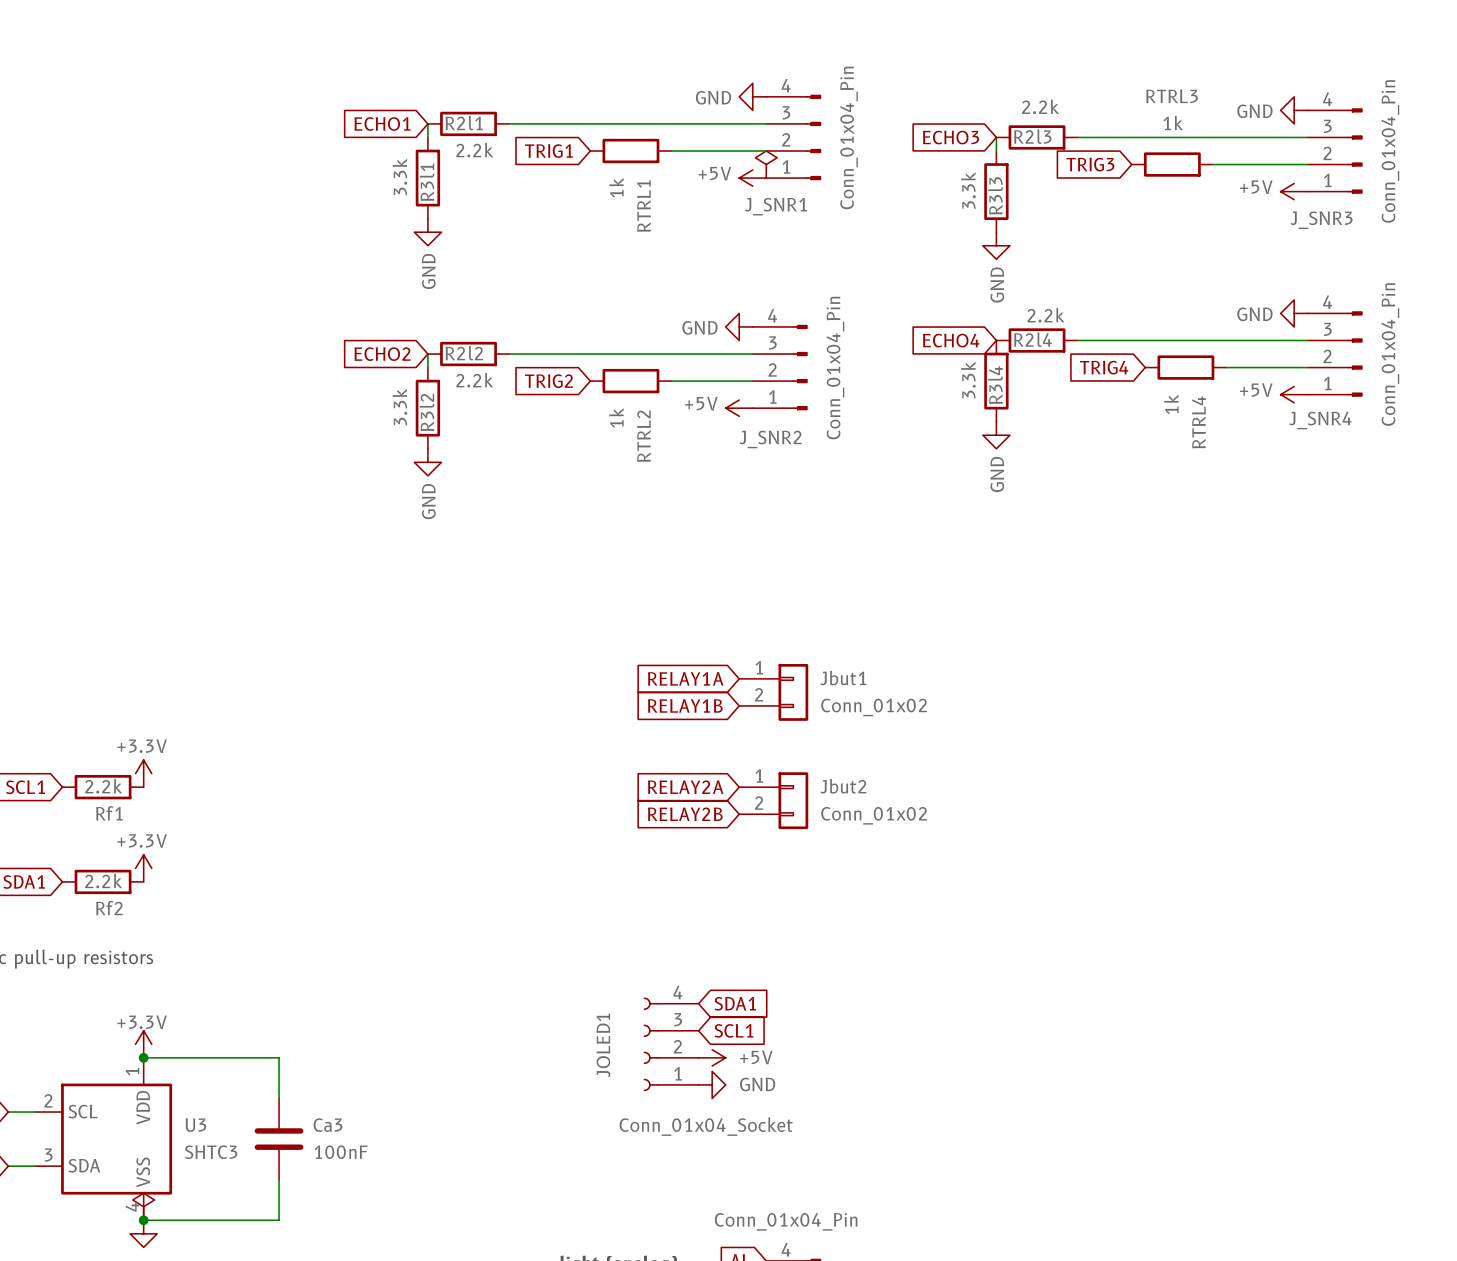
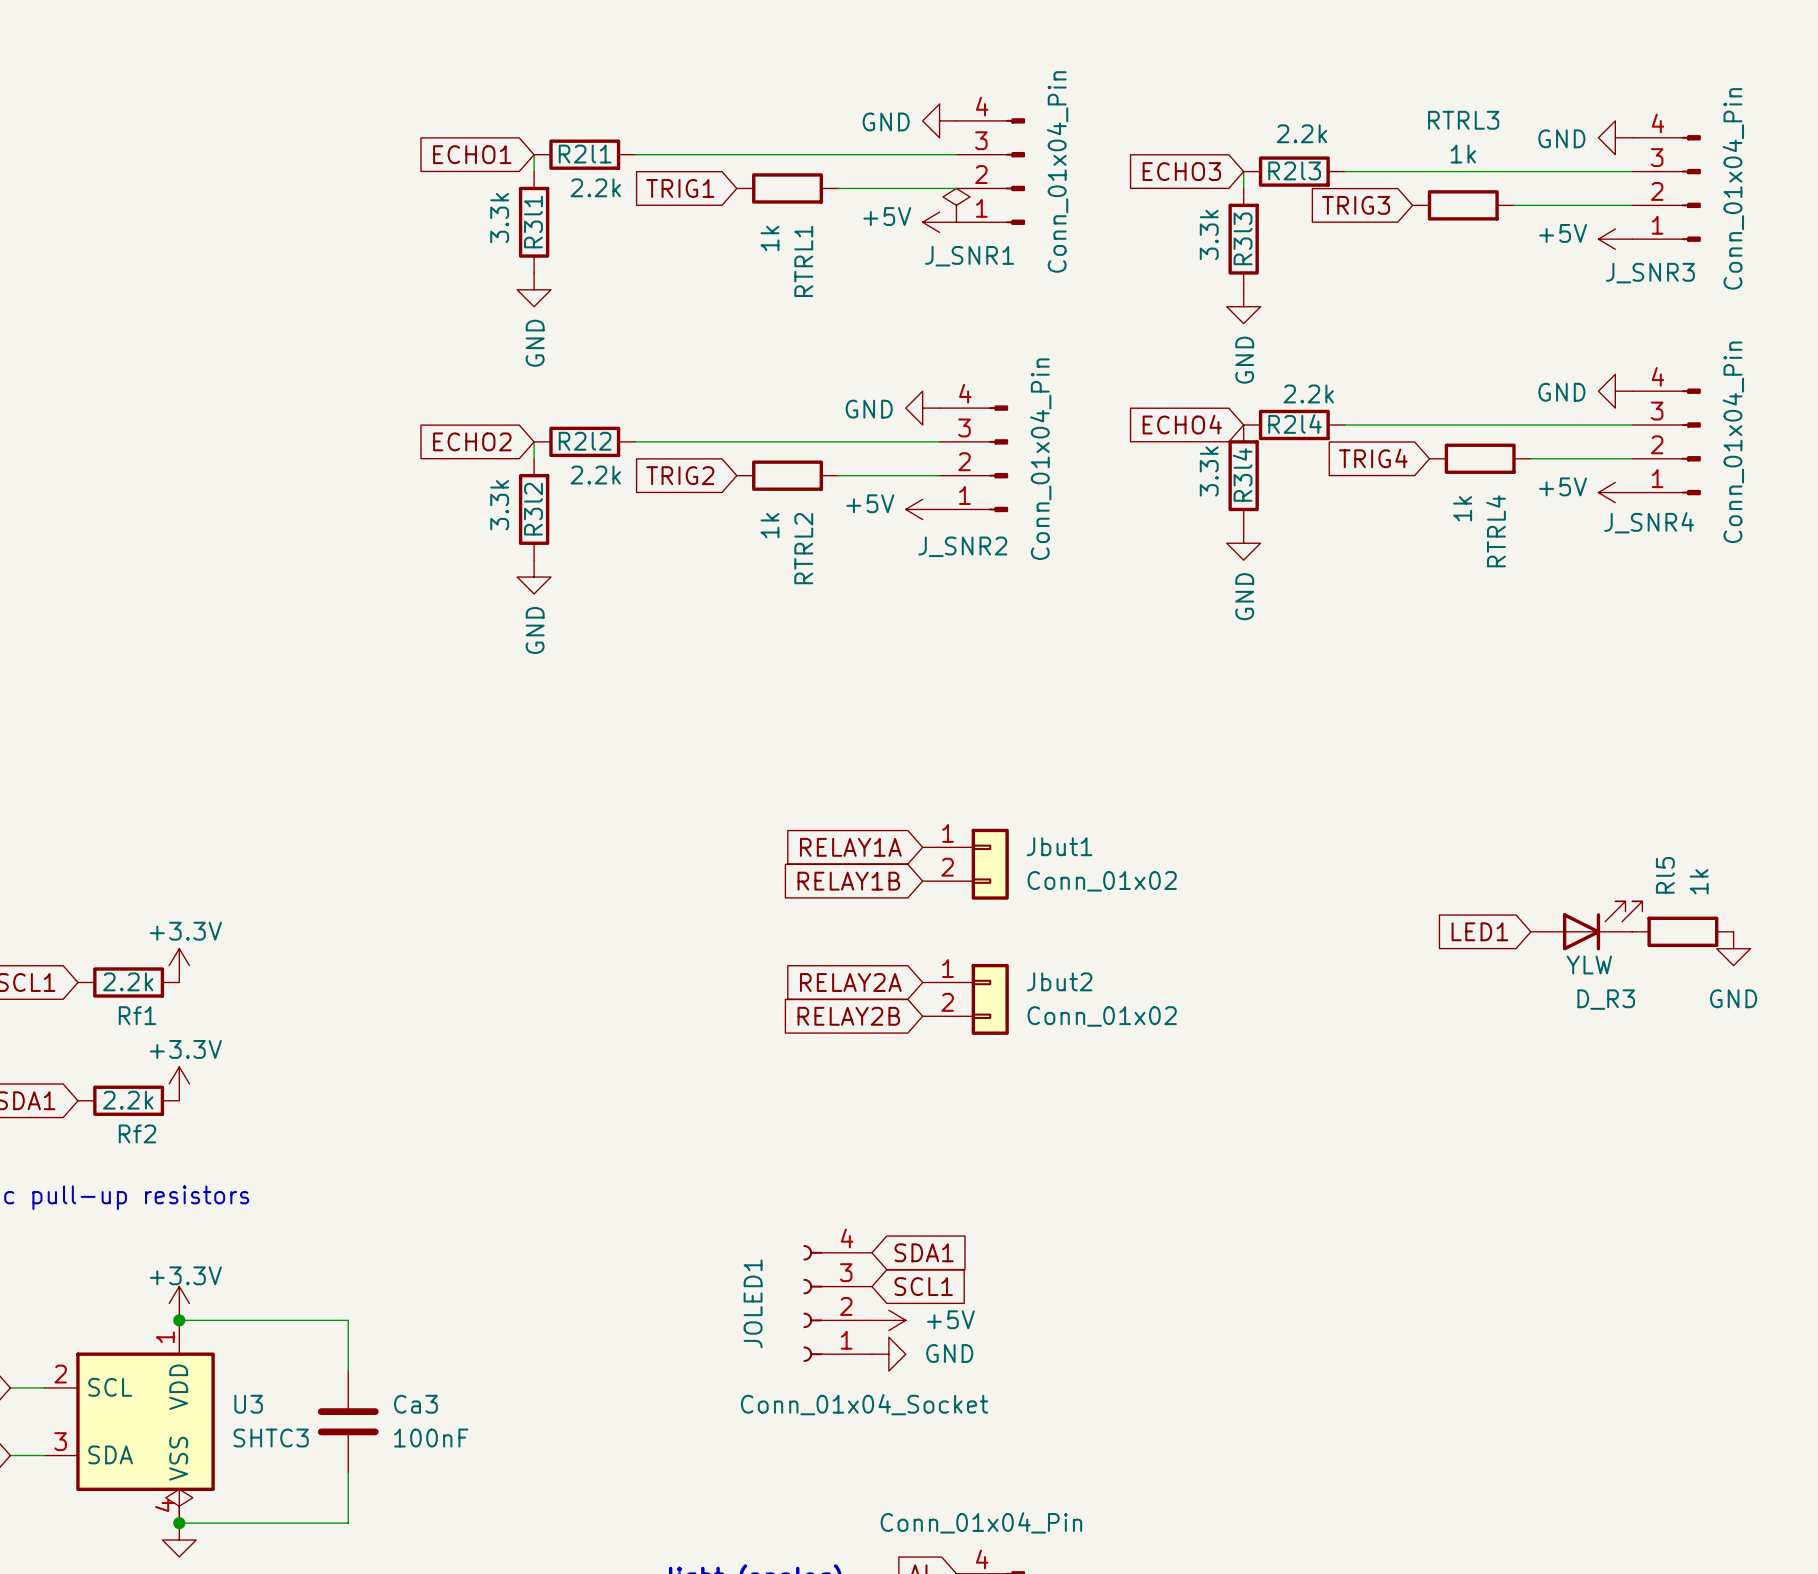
D_R3: none -> YLW (1586, 925)
global label: none -> LED1 (1479, 931)
Rl5: none -> 1k (1682, 931)
power symbol: none -> GND (1733, 948)

